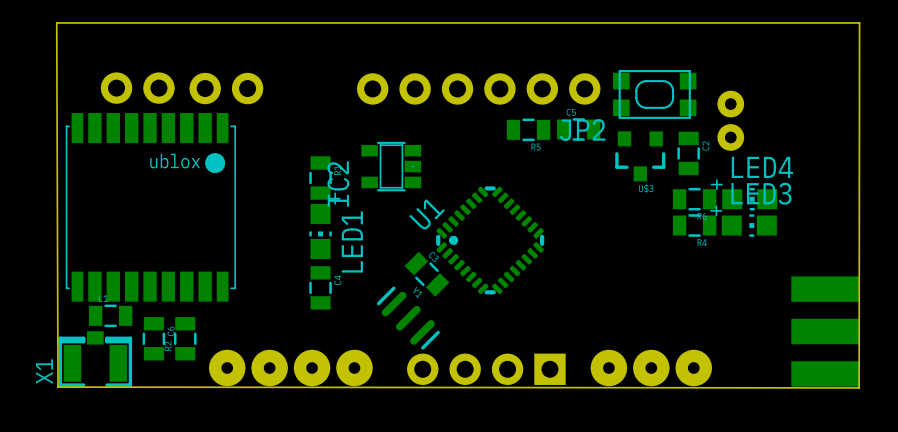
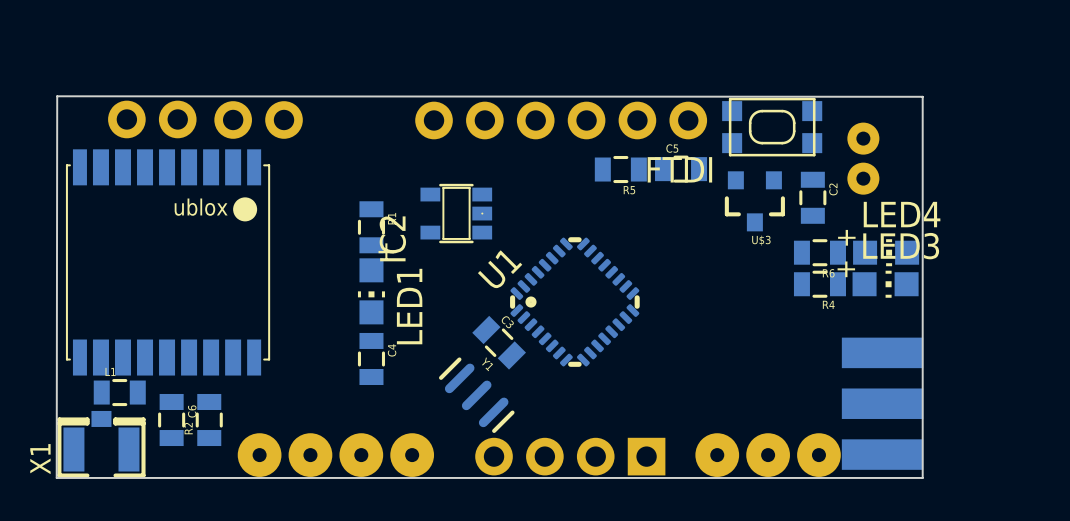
board edge: (859, 22) (56, 22) (58, 387) (859, 387) (859, 22) -> (57, 96) (922, 96) (922, 477) (56, 477) (57, 96)
JP2 name: JP2 (582, 130) -> FTDI (679, 169)
part position: (825, 331) -> (882, 403)

